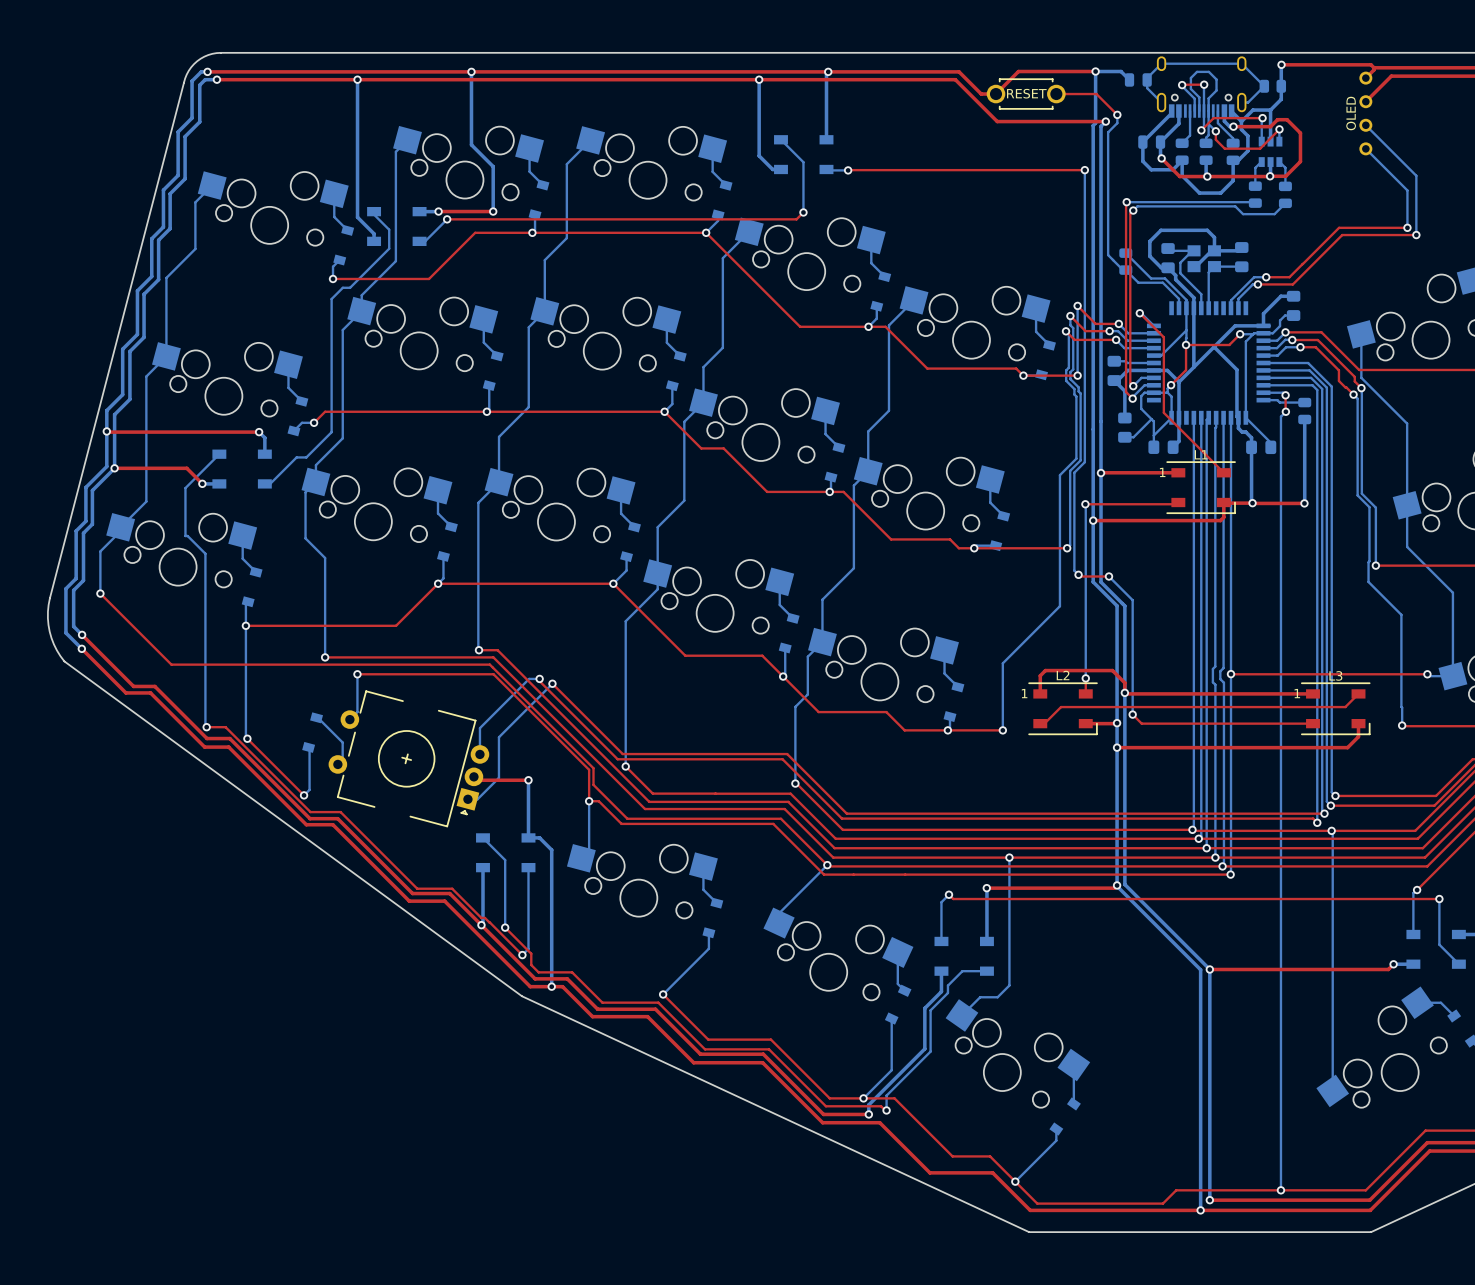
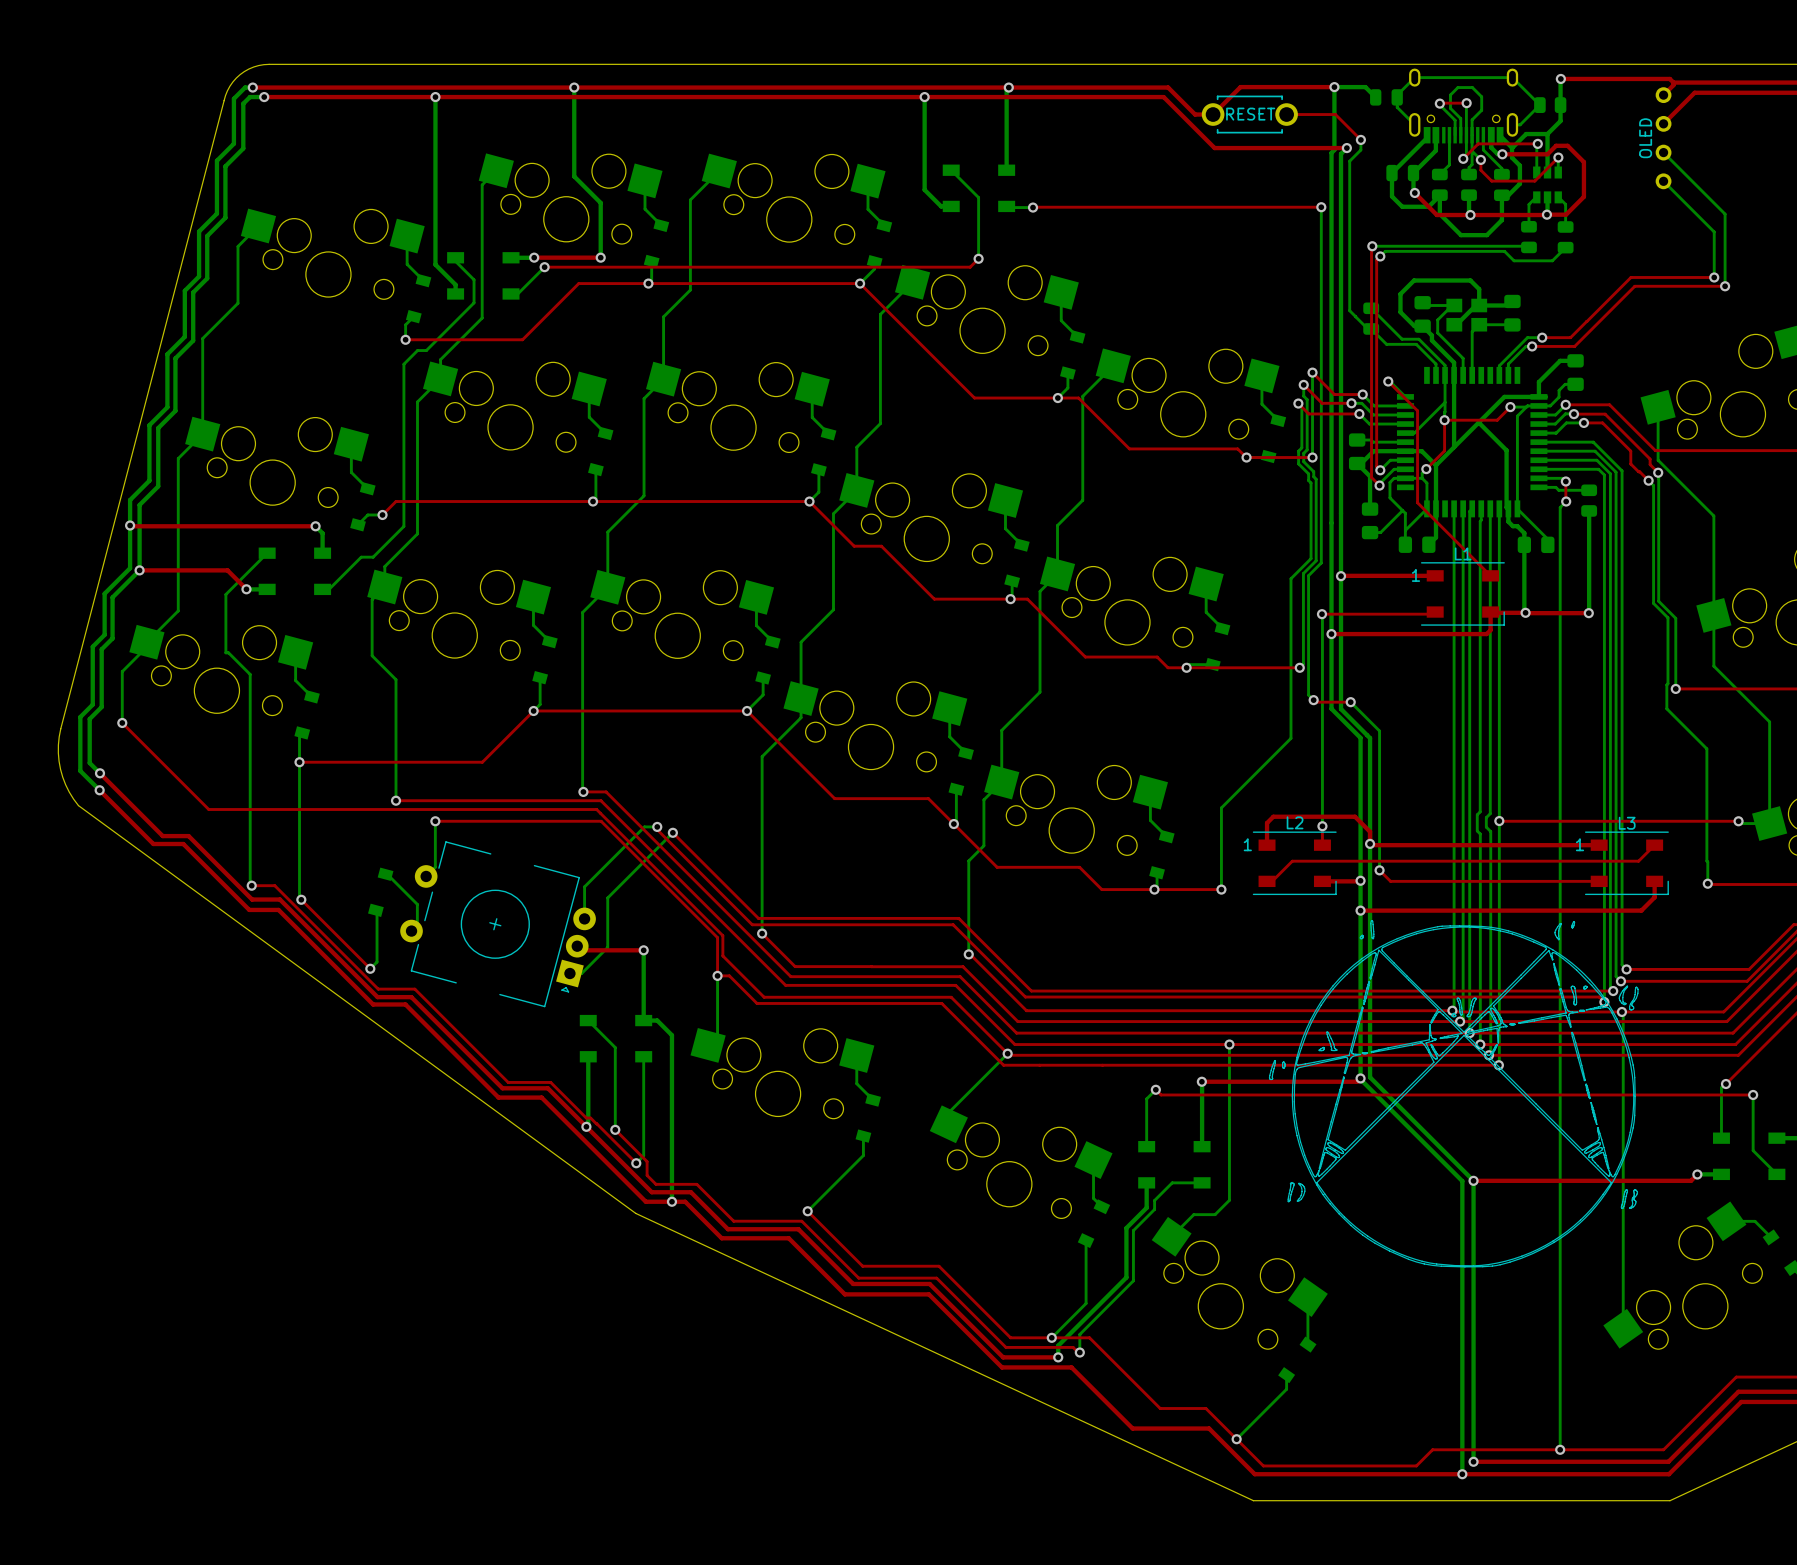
line: none -> (1372, 920) (1373, 938) (1372, 920)
line: none -> (1574, 921) (1572, 927) (1574, 921)
line: none -> (1560, 923) (1558, 939) (1555, 932) (1560, 923)
line: none -> (1459, 925) (1491, 927) (1516, 933) (1545, 945) (1572, 963) (1594, 985) (1613, 1011) (1626, 1041) (1634, 1071) (1634, 1115) (1631, 1135) (1617, 1173) (1600, 1200) (1579, 1223) (1554, 1242) (1521, 1258) (1492, 1266) (1441, 1266) (1424, 1263) (1389, 1250) (1362, 1234) (1339, 1214) (1316, 1184) (1302, 1154) (1293, 1116) (1292, 1086) (1299, 1047) (1315, 1011) (1332, 986) (1362, 958) (1388, 942) (1427, 928) (1459, 925)
line: none -> (1469, 927) (1512, 933) (1546, 948) (1463, 1032) (1381, 949) (1393, 942) (1425, 931) (1469, 927)
line: none -> (1362, 935) (1362, 935) (1362, 935) (1362, 935) (1361, 935) (1360, 937) (1360, 938) (1362, 937) (1362, 935)
line: none -> (1378, 950) (1438, 1009) (1431, 1022) (1439, 1011) (1461, 1033) (1440, 1038) (1458, 1036) (1439, 1055) (1431, 1044) (1436, 1059) (1431, 1054) (1426, 1043) (1436, 1039) (1431, 1037) (1429, 1024) (1429, 1039) (1371, 1051) (1421, 1042) (1433, 1062) (1345, 1150) (1328, 1139) (1343, 1077) (1319, 1168) (1325, 1152) (1335, 1159) (1320, 1175) (1318, 1175) (1319, 1170) (1315, 1176) (1304, 1155) (1297, 1128) (1294, 1101) (1295, 1071) (1299, 1067) (1345, 1057) (1347, 1058) (1345, 1073) (1350, 1058) (1360, 1054) (1351, 1052) (1362, 1007) (1349, 1055) (1297, 1065) (1296, 1062) (1311, 1022) (1326, 996) (1347, 974) (1375, 952) (1370, 978) (1378, 950)
line: none -> (1548, 950) (1552, 959) (1553, 952) (1562, 958) (1576, 970) (1605, 1000) (1604, 1004) (1586, 1009) (1606, 1007) (1609, 1008) (1626, 1048) (1632, 1076) (1633, 1113) (1625, 1149) (1613, 1176) (1609, 1170) (1609, 1175) (1607, 1175) (1592, 1159) (1603, 1152) (1608, 1168) (1598, 1127) (1598, 1139) (1582, 1150) (1490, 1058) (1497, 1044) (1488, 1055) (1466, 1034) (1496, 1028) (1498, 1043) (1499, 1028) (1506, 1026) (1493, 1006) (1548, 950)
line: none -> (1553, 963) (1553, 963) (1555, 968) (1557, 974) (1559, 985) (1553, 963)
line: none -> (1369, 981) (1363, 1004) (1369, 981)
line: none -> (1572, 986) (1575, 1004) (1574, 988) (1572, 986)
line: none -> (1585, 986) (1587, 987) (1584, 988) (1583, 987) (1584, 986) (1585, 986)
line: none -> (1627, 986) (1623, 995) (1623, 1002) (1625, 1003) (1624, 1004) (1619, 997) (1627, 986)
line: none -> (1636, 987) (1637, 988) (1637, 989) (1637, 995) (1631, 1004) (1633, 1008) (1630, 1009) (1629, 1006) (1636, 987)
line: none -> (1560, 988) (1561, 991) (1567, 1010) (1577, 1012) (1568, 1014) (1570, 1027) (1565, 1015) (1518, 1023) (1566, 1013) (1560, 988)
line: none -> (1458, 998) (1461, 1015) (1460, 1001) (1458, 998)
line: none -> (1474, 998) (1476, 998) (1471, 1013) (1467, 1016) (1474, 998)
line: none -> (1491, 1008) (1490, 1009) (1497, 1023) (1488, 1011) (1467, 1032) (1500, 1024) (1498, 1016) (1491, 1008)
line: none -> (1580, 1010) (1583, 1010) (1584, 1010) (1579, 1010) (1580, 1010)
line: none -> (1453, 1013) (1455, 1016) (1452, 1015) (1452, 1014) (1453, 1013) (1453, 1013)
line: none -> (1510, 1023) (1513, 1023) (1514, 1024) (1509, 1024) (1510, 1023)
line: none -> (1327, 1032) (1331, 1049) (1336, 1050) (1327, 1032)
line: none -> (1572, 1032) (1584, 1080) (1572, 1032)
line: none -> (1464, 1035) (1316, 1182) (1334, 1206) (1350, 1222) (1387, 1247) (1408, 1256) (1429, 1262) (1481, 1265) (1521, 1256) (1552, 1241) (1586, 1214) (1611, 1182) (1464, 1035)
line: none -> (1323, 1047) (1323, 1050) (1319, 1050) (1323, 1047)
line: none -> (1363, 1052) (1366, 1052) (1367, 1053) (1362, 1053) (1363, 1052)
line: none -> (1275, 1060) (1272, 1078) (1270, 1079) (1269, 1075) (1275, 1060)
line: none -> (1283, 1062) (1285, 1065) (1283, 1068) (1283, 1062)
line: none -> (1586, 1084) (1589, 1098) (1586, 1084)
line: none -> (1591, 1102) (1591, 1102) (1592, 1107) (1594, 1114) (1596, 1124) (1591, 1102)
line: none -> (1328, 1142) (1338, 1147) (1343, 1152) (1329, 1146) (1328, 1142)
line: none -> (1598, 1142) (1599, 1142) (1599, 1142) (1600, 1143) (1598, 1146) (1584, 1152) (1598, 1142)
line: none -> (1327, 1147) (1326, 1150) (1339, 1157) (1336, 1152) (1327, 1147)
line: none -> (1600, 1147) (1591, 1152) (1588, 1157) (1601, 1150) (1600, 1147)
line: none -> (1292, 1183) (1293, 1185) (1288, 1201) (1290, 1183) (1292, 1183)
line: none -> (1299, 1183) (1303, 1186) (1304, 1190) (1301, 1198) (1297, 1201) (1301, 1191) (1299, 1183)
line: none -> (1626, 1189) (1625, 1190) (1624, 1193) (1622, 1208) (1626, 1189)
line: none -> (1634, 1189) (1632, 1204) (1629, 1208) (1635, 1203) (1633, 1199) (1637, 1192) (1634, 1189)

